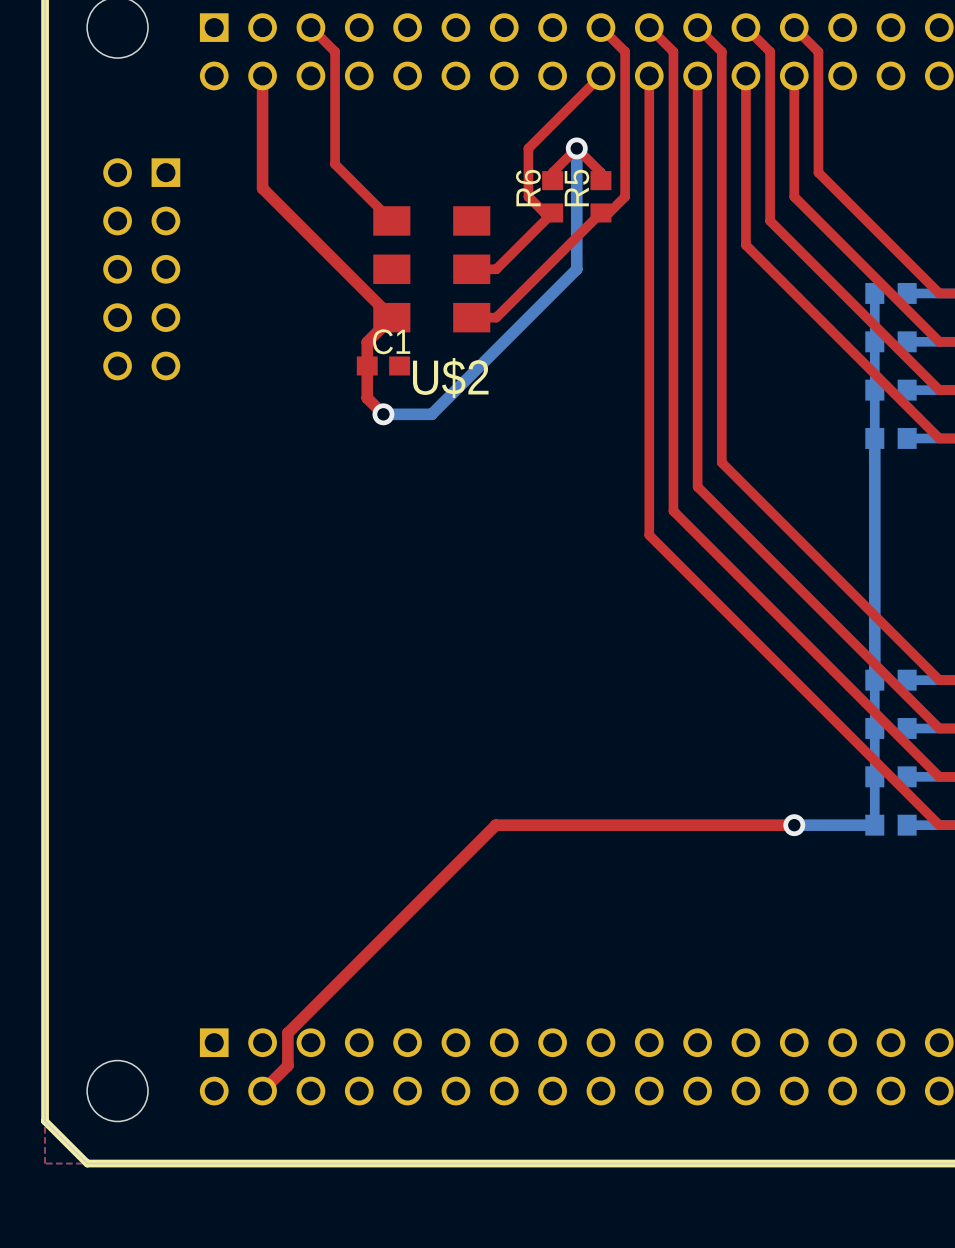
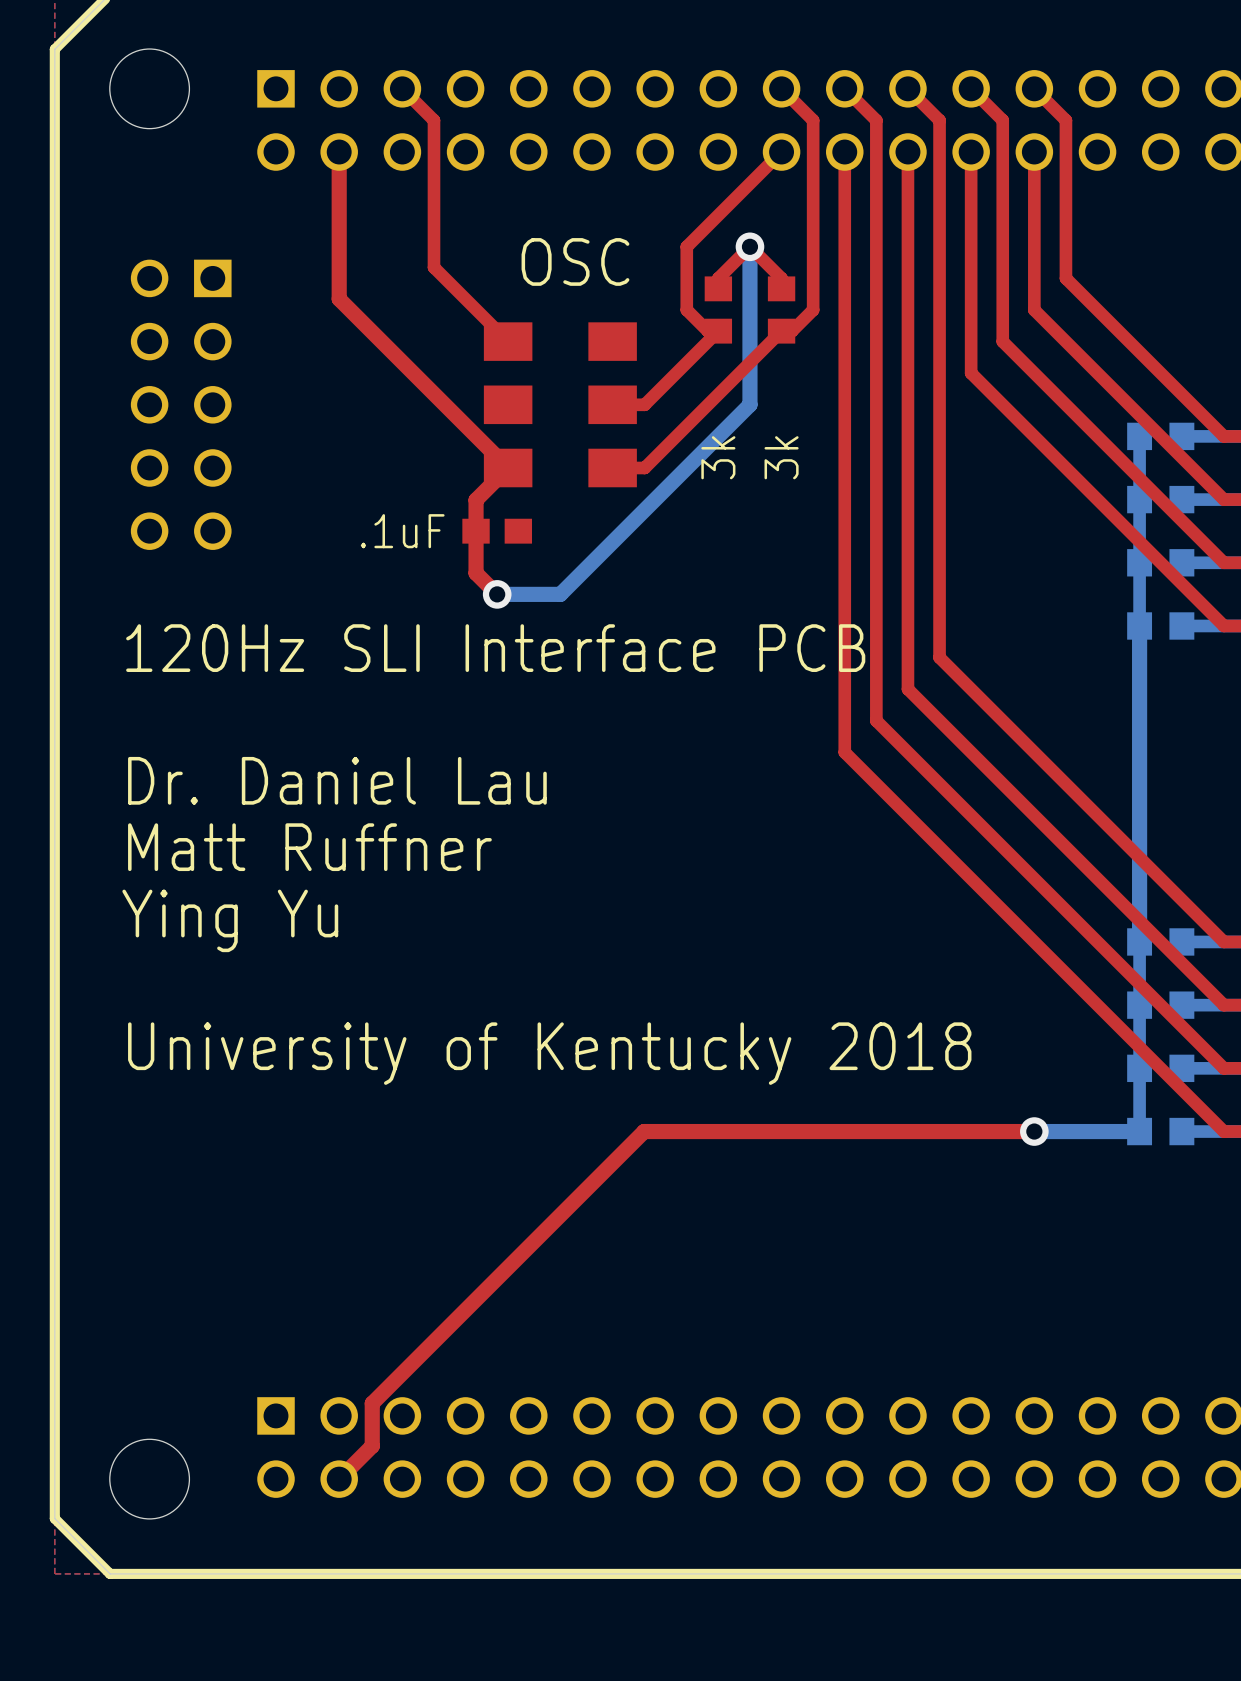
R6 name: R6 (528, 188) -> none
R5 name: R5 (576, 188) -> none
R6 value: none -> 3k (718, 457)
R5 value: none -> 3k (781, 457)
C1 name: C1 (391, 341) -> none
C1 value: none -> .1uF (402, 531)
U$2 name: U$2 (450, 377) -> OSC (575, 261)
text: none -> 120Hz SLI Interface PCB (495, 648)
text: none -> Dr. Daniel Lau (337, 780)
text: none -> Matt Ruffner (309, 847)
text: none -> Ying Yu (230, 920)
text: none -> University of Kentucky 2018 (549, 1053)

